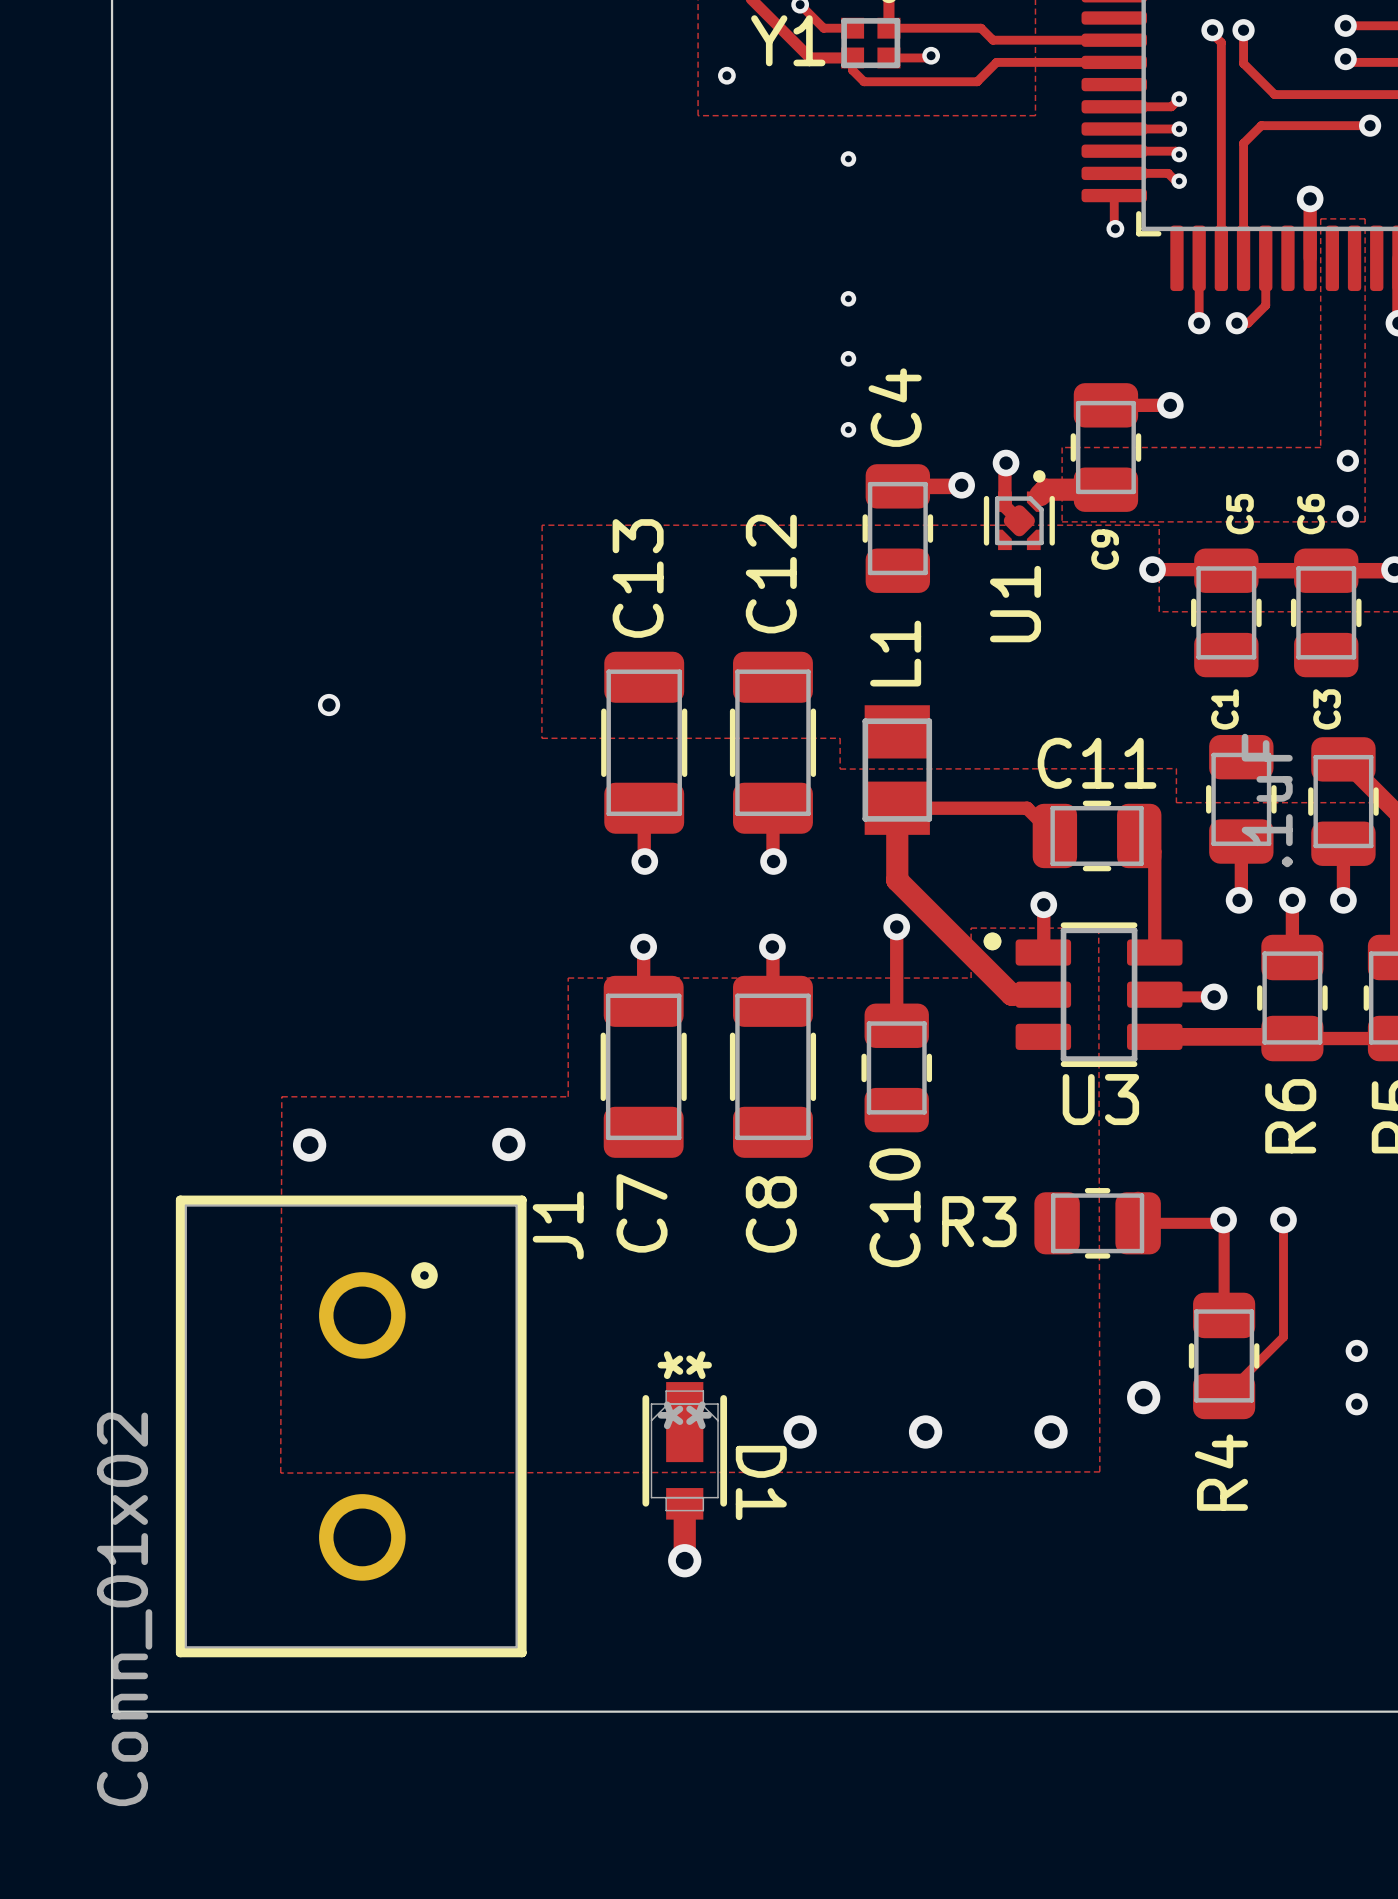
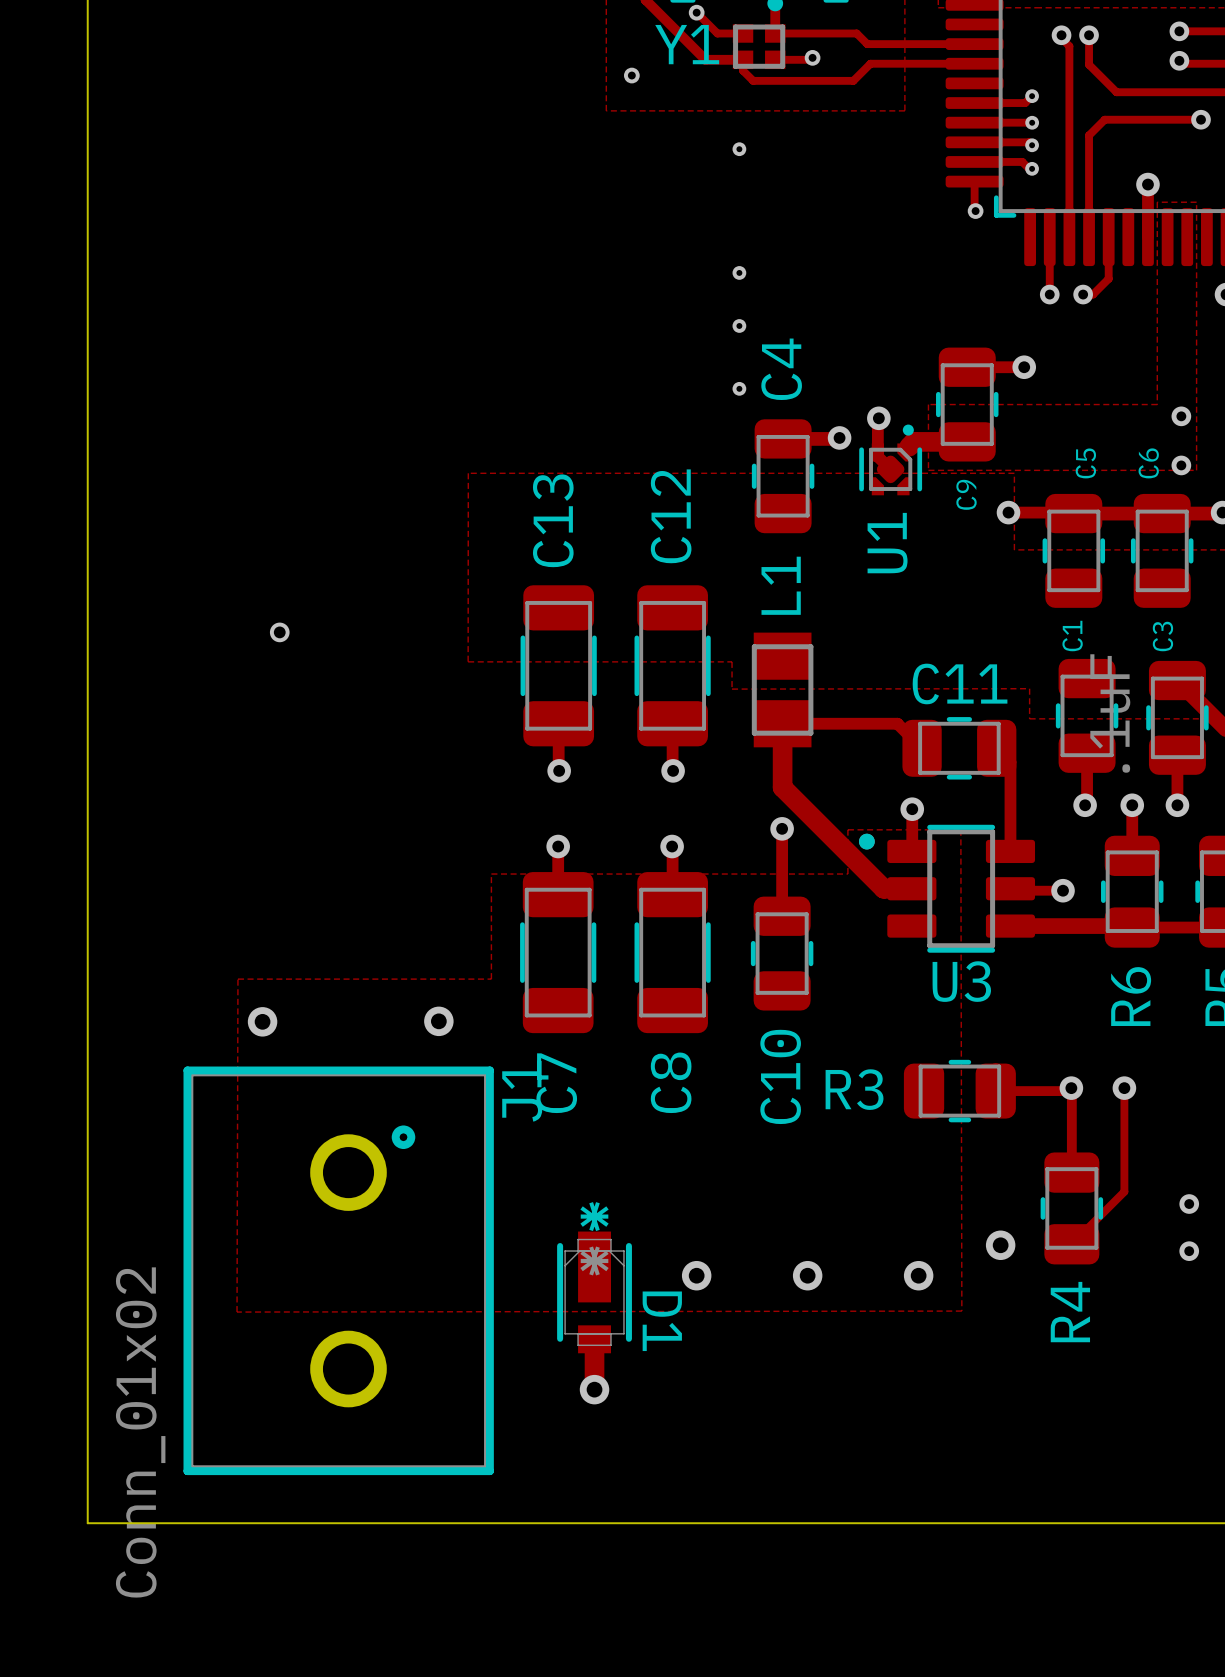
J1 position: (351, 1426) -> (338, 1270)

